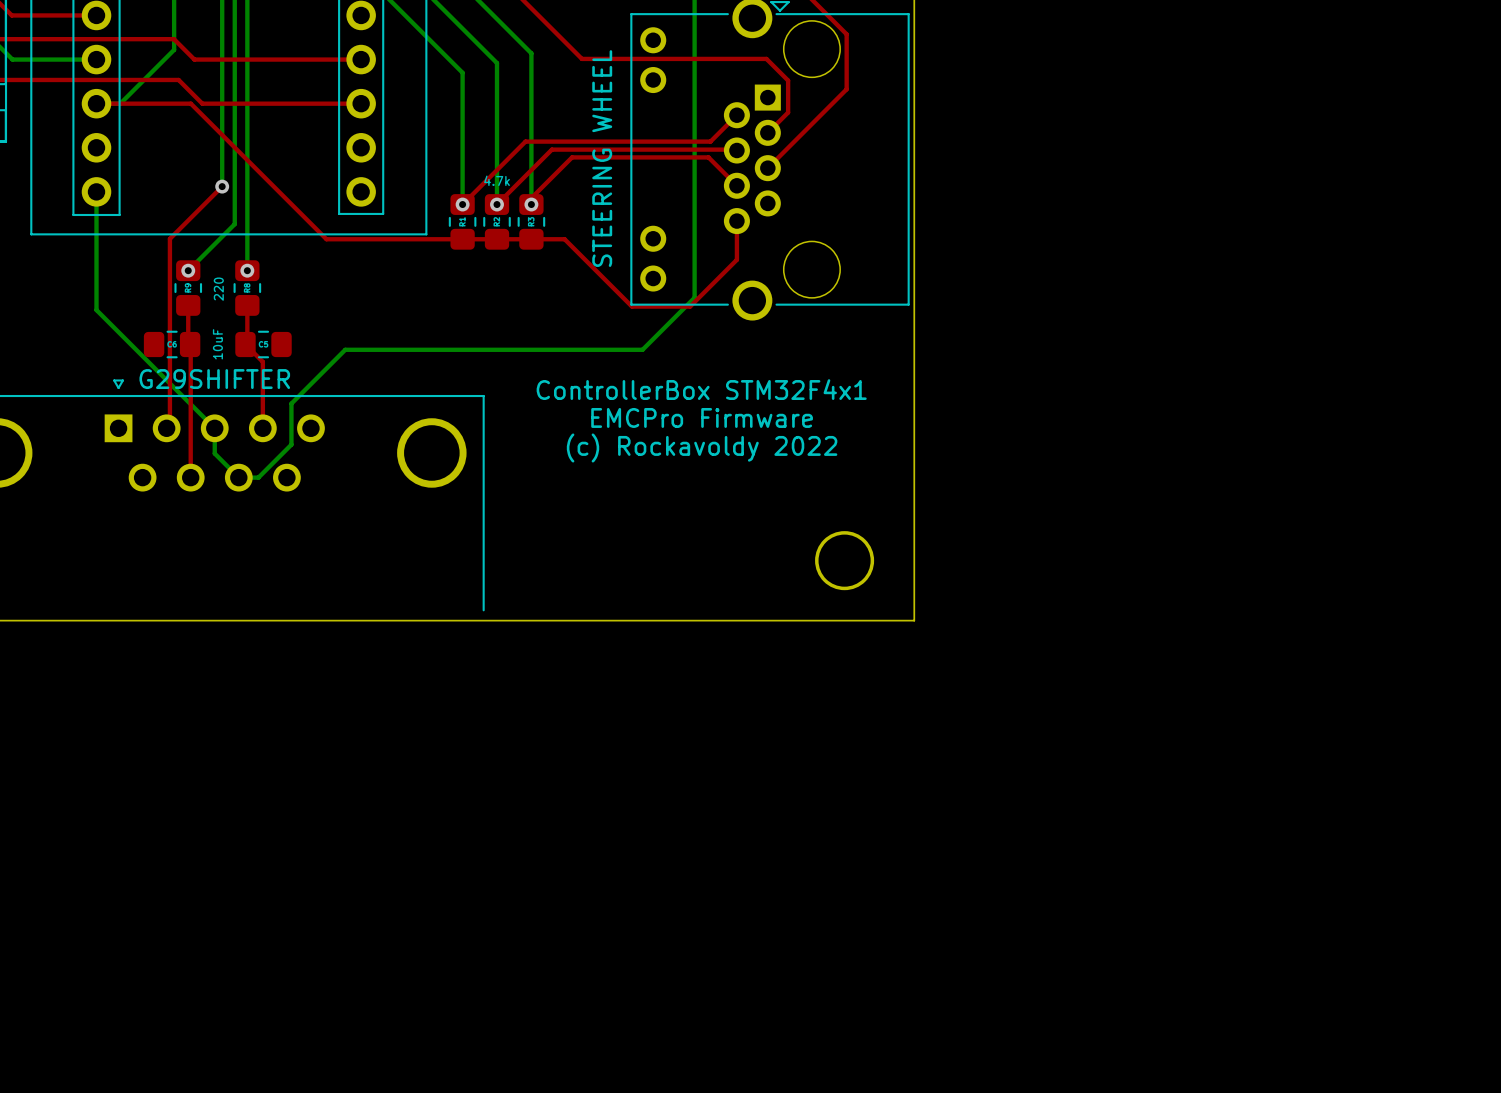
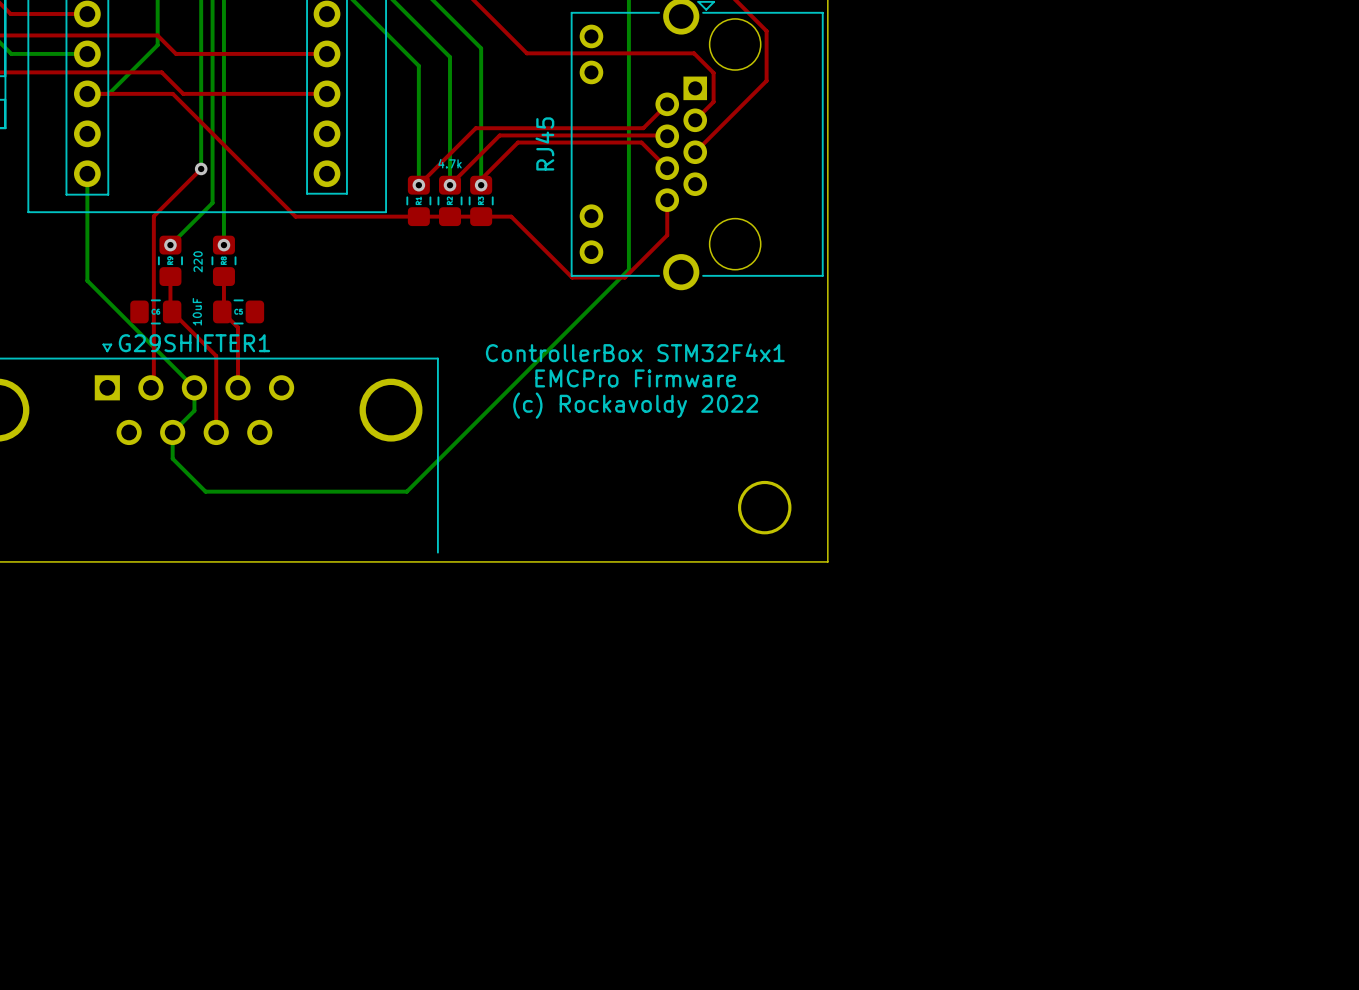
part value: STEERING WHEEL (602, 158) -> RJ45 (544, 143)
top track: (190, 345) (190, 477) -> (172, 312) (216, 356) (216, 432)
bottom track: (642, 349) (345, 349) (291, 403) (291, 444) (258, 477) (238, 477) (214, 453) -> (581, 316) (406, 491) (205, 491) (172, 458) (172, 432) (194, 410)
G29SHIFTER name: G29SHIFTER (214, 379) -> G29SHIFTER1 (194, 343)

